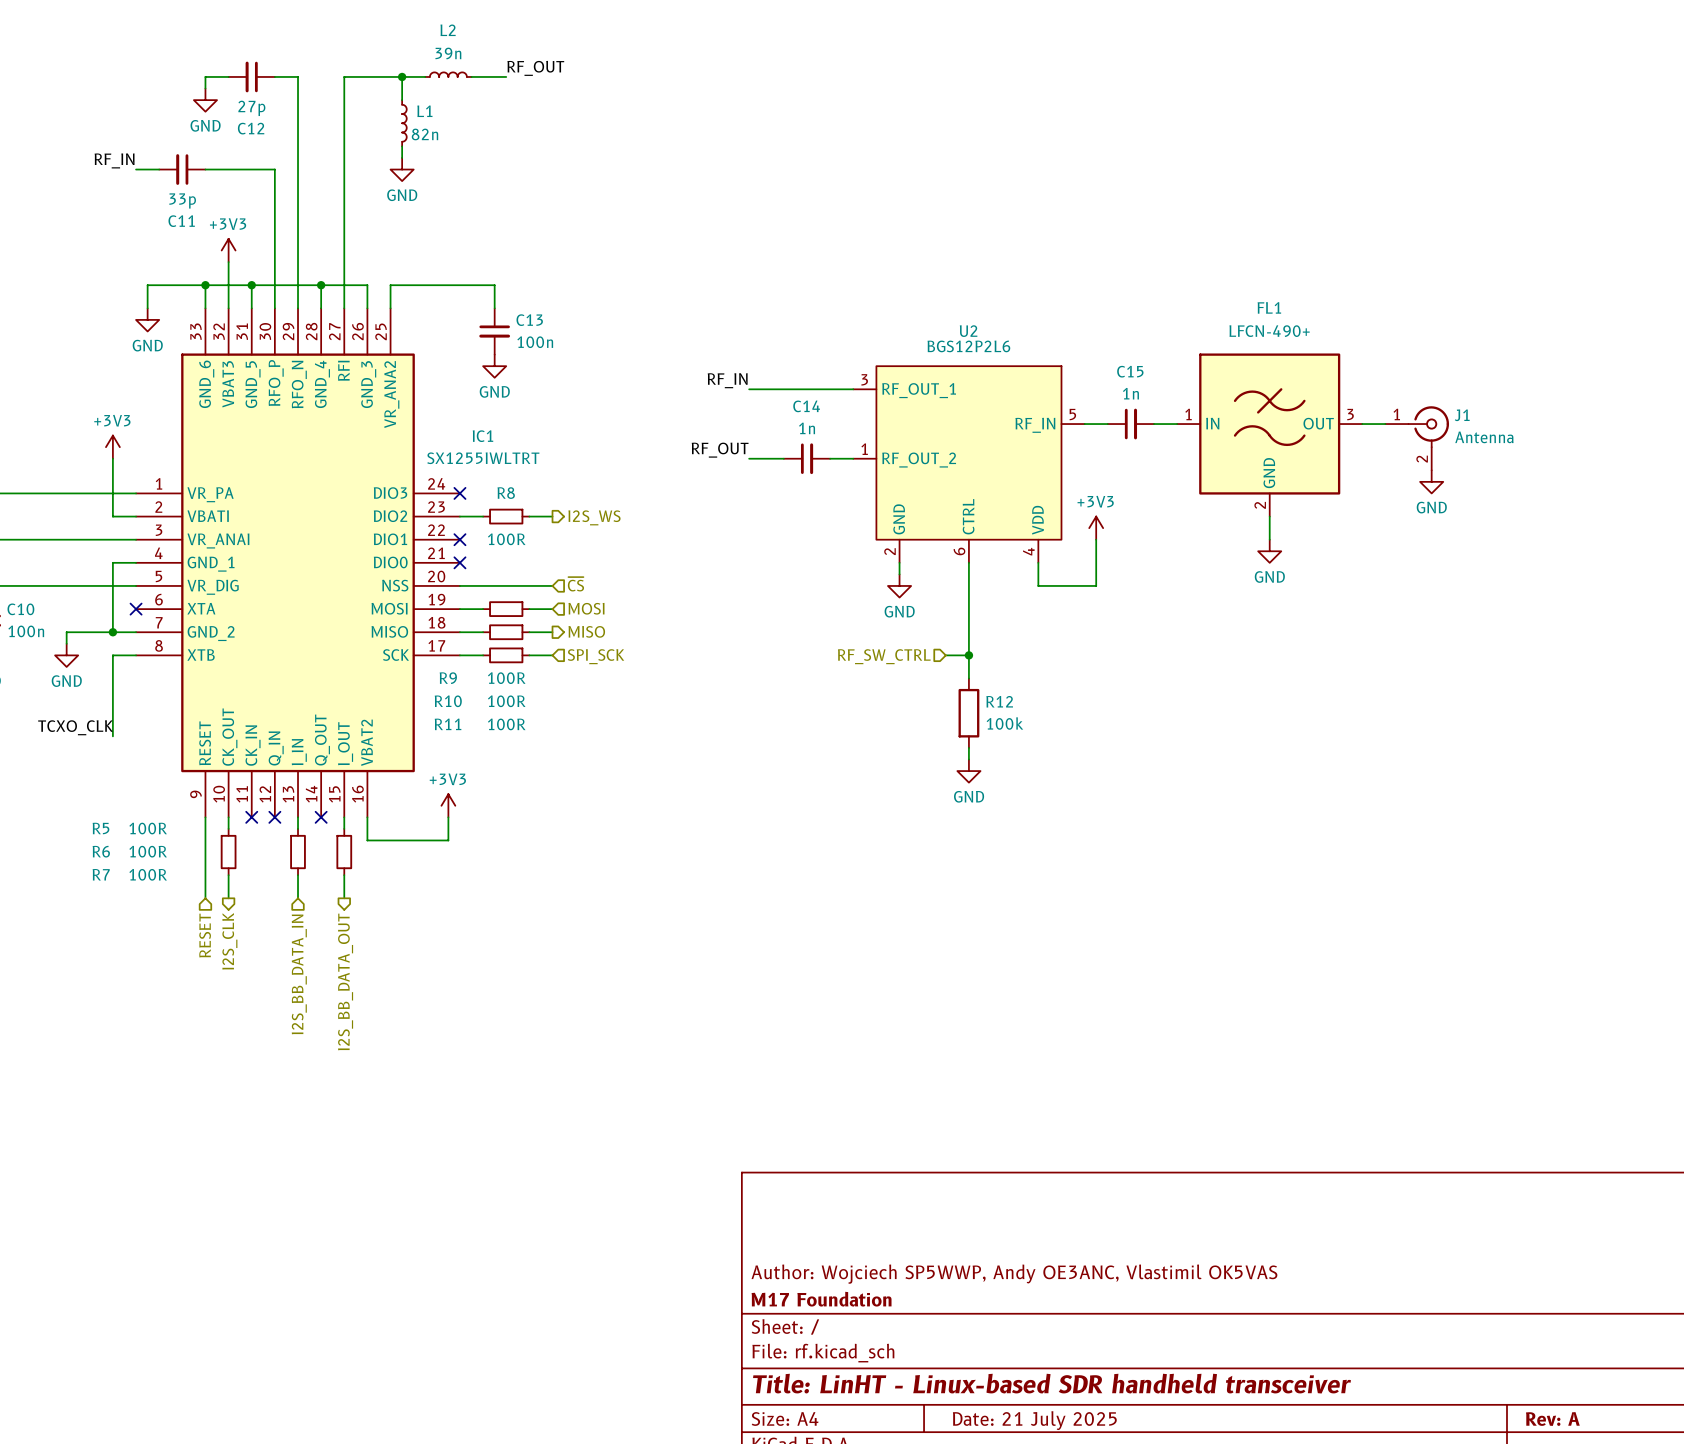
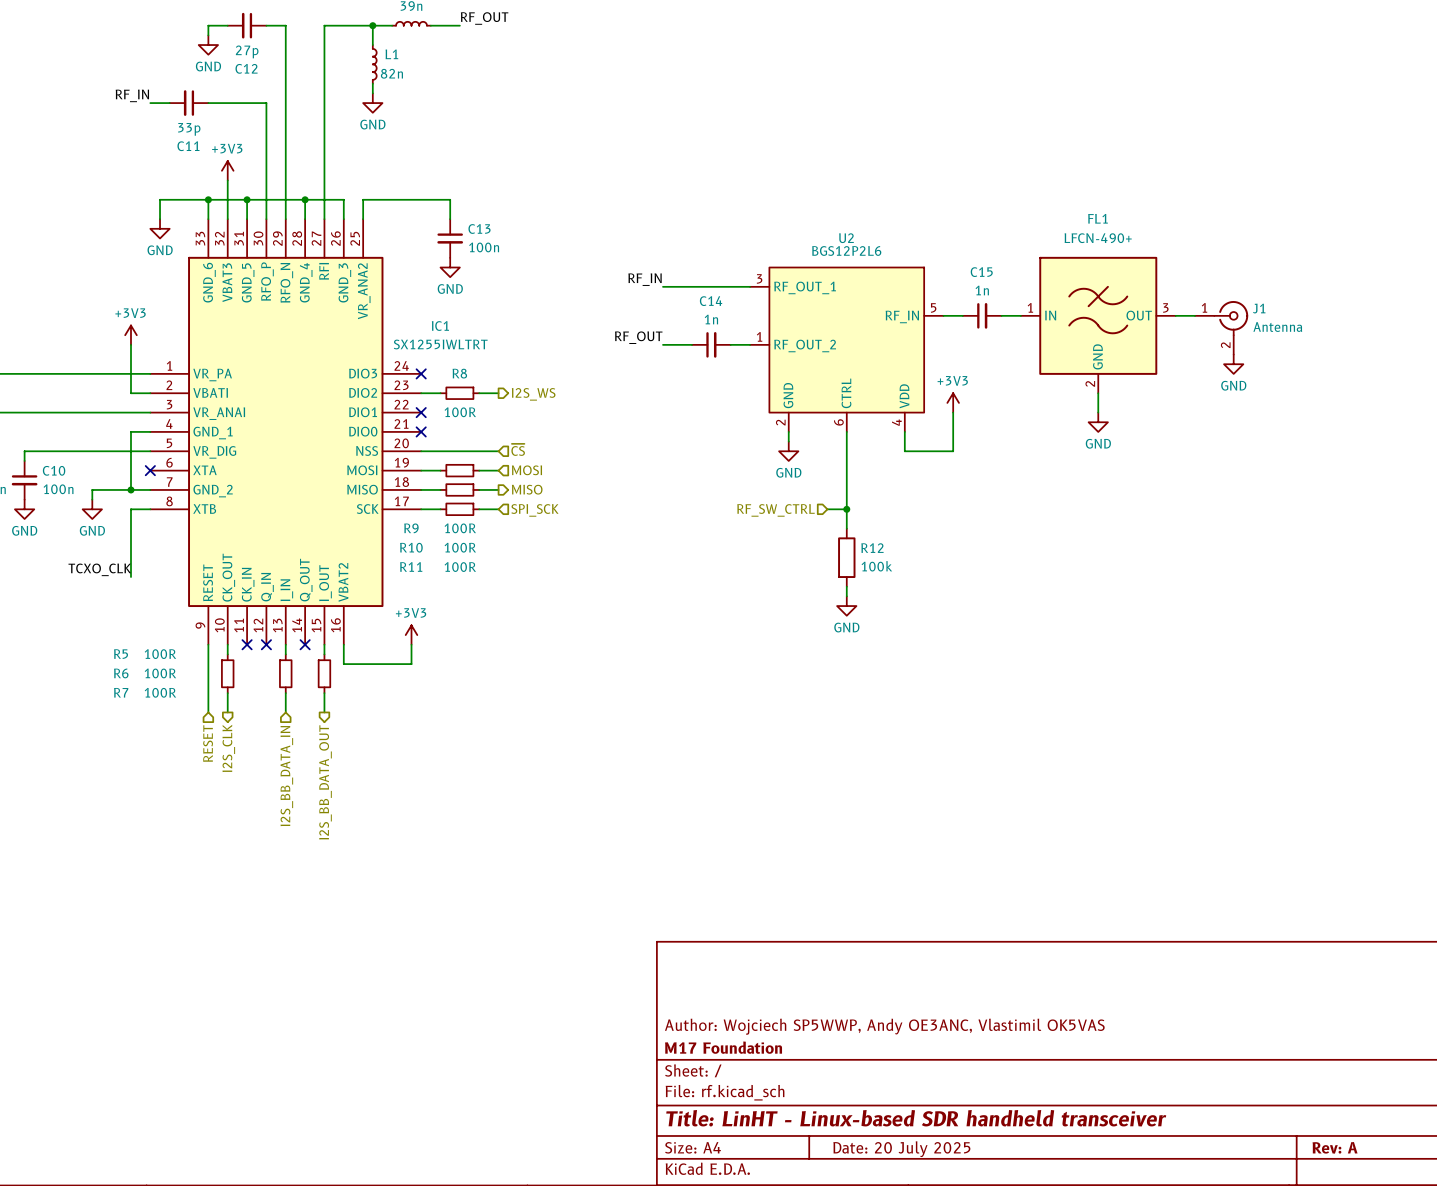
title block: Date: 21 July 2025 (1034, 1420) -> Date: 20 July 2025 (901, 1149)

